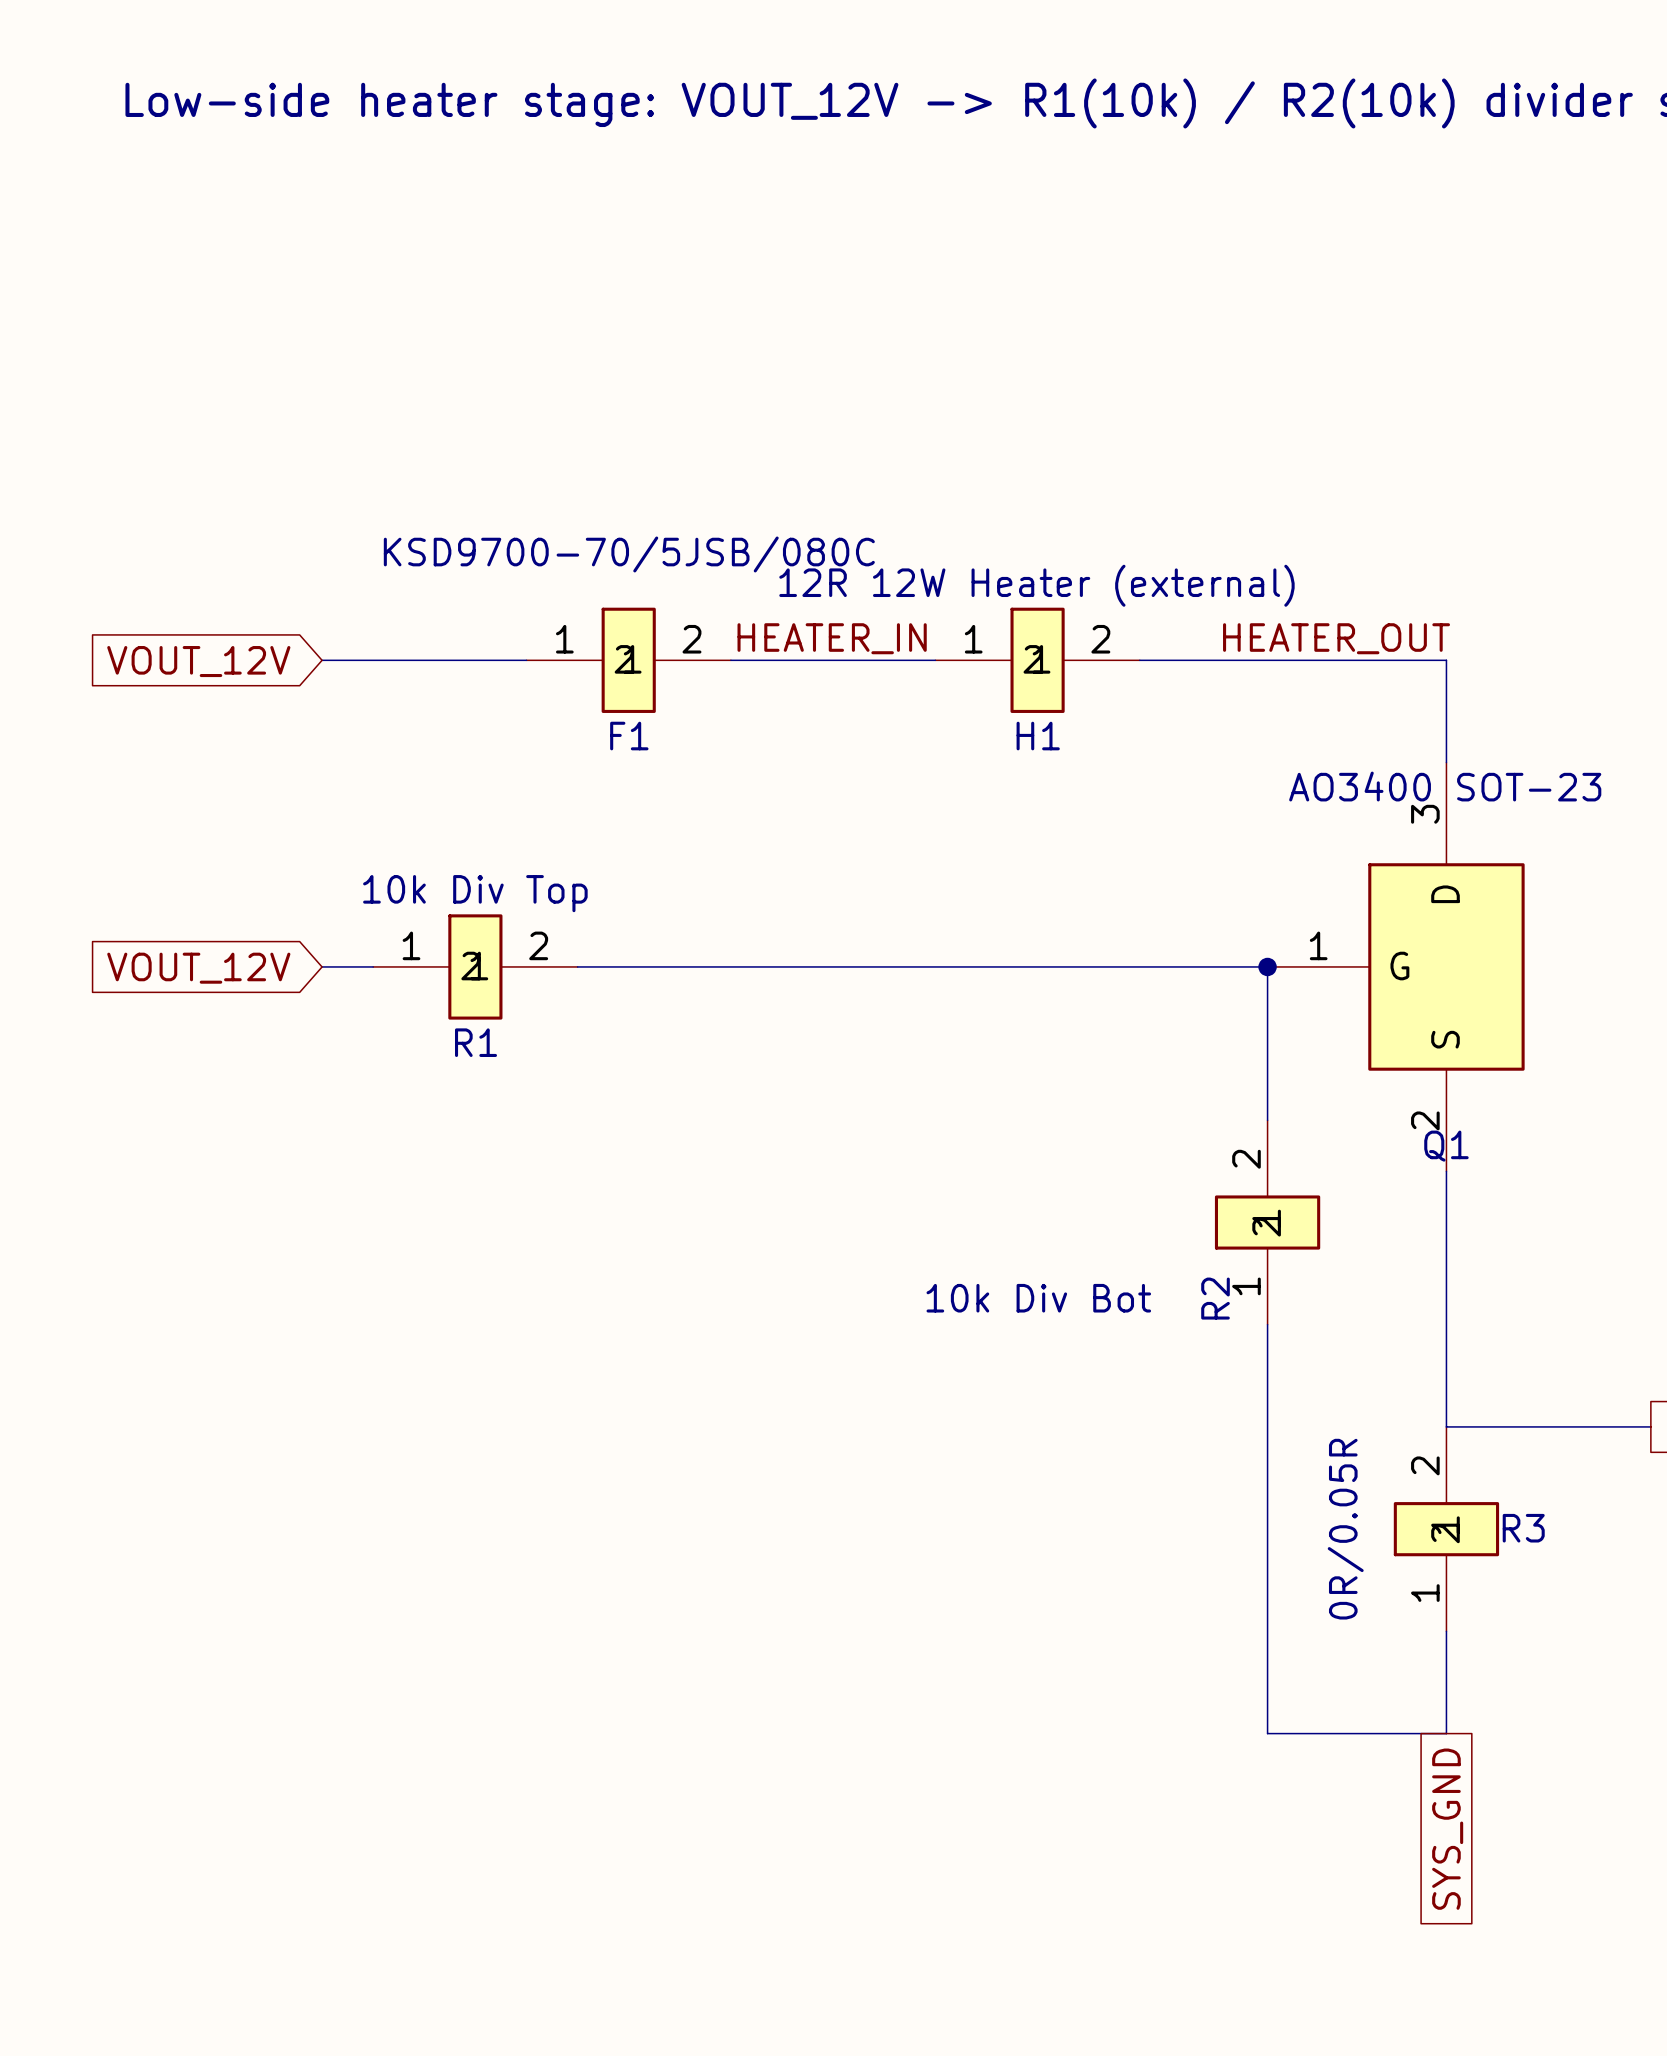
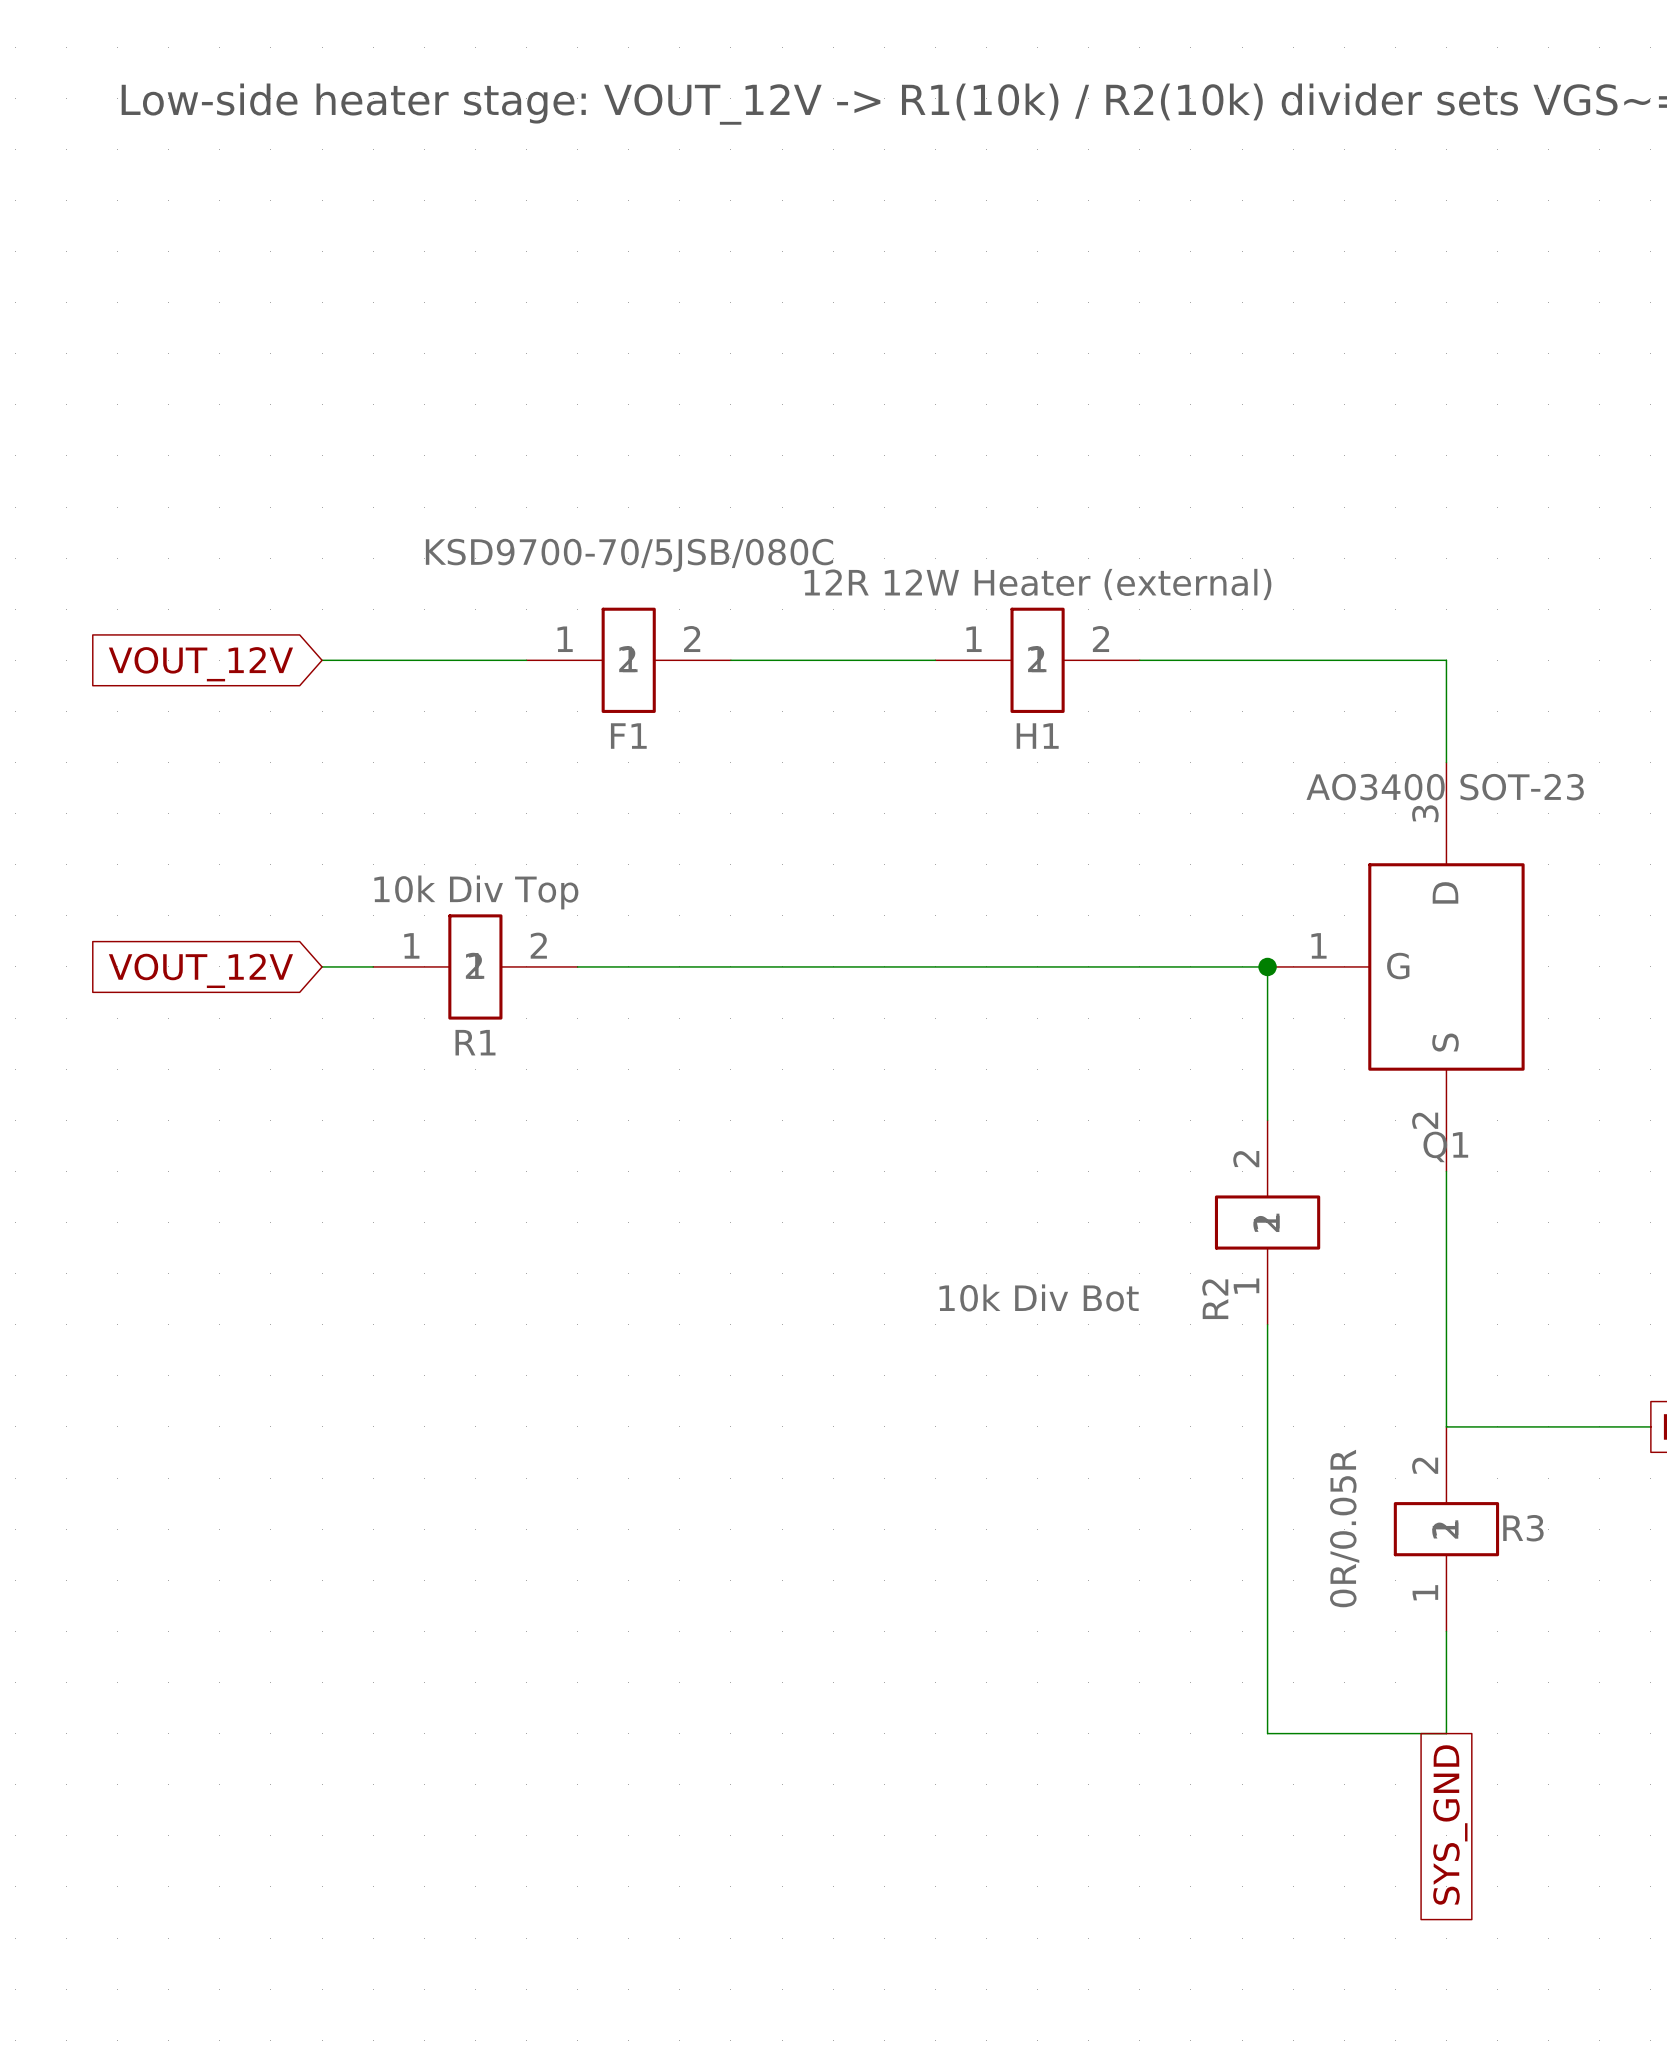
label: HEATER_IN (832, 638) -> none
label: HEATER_OUT (1336, 638) -> none

